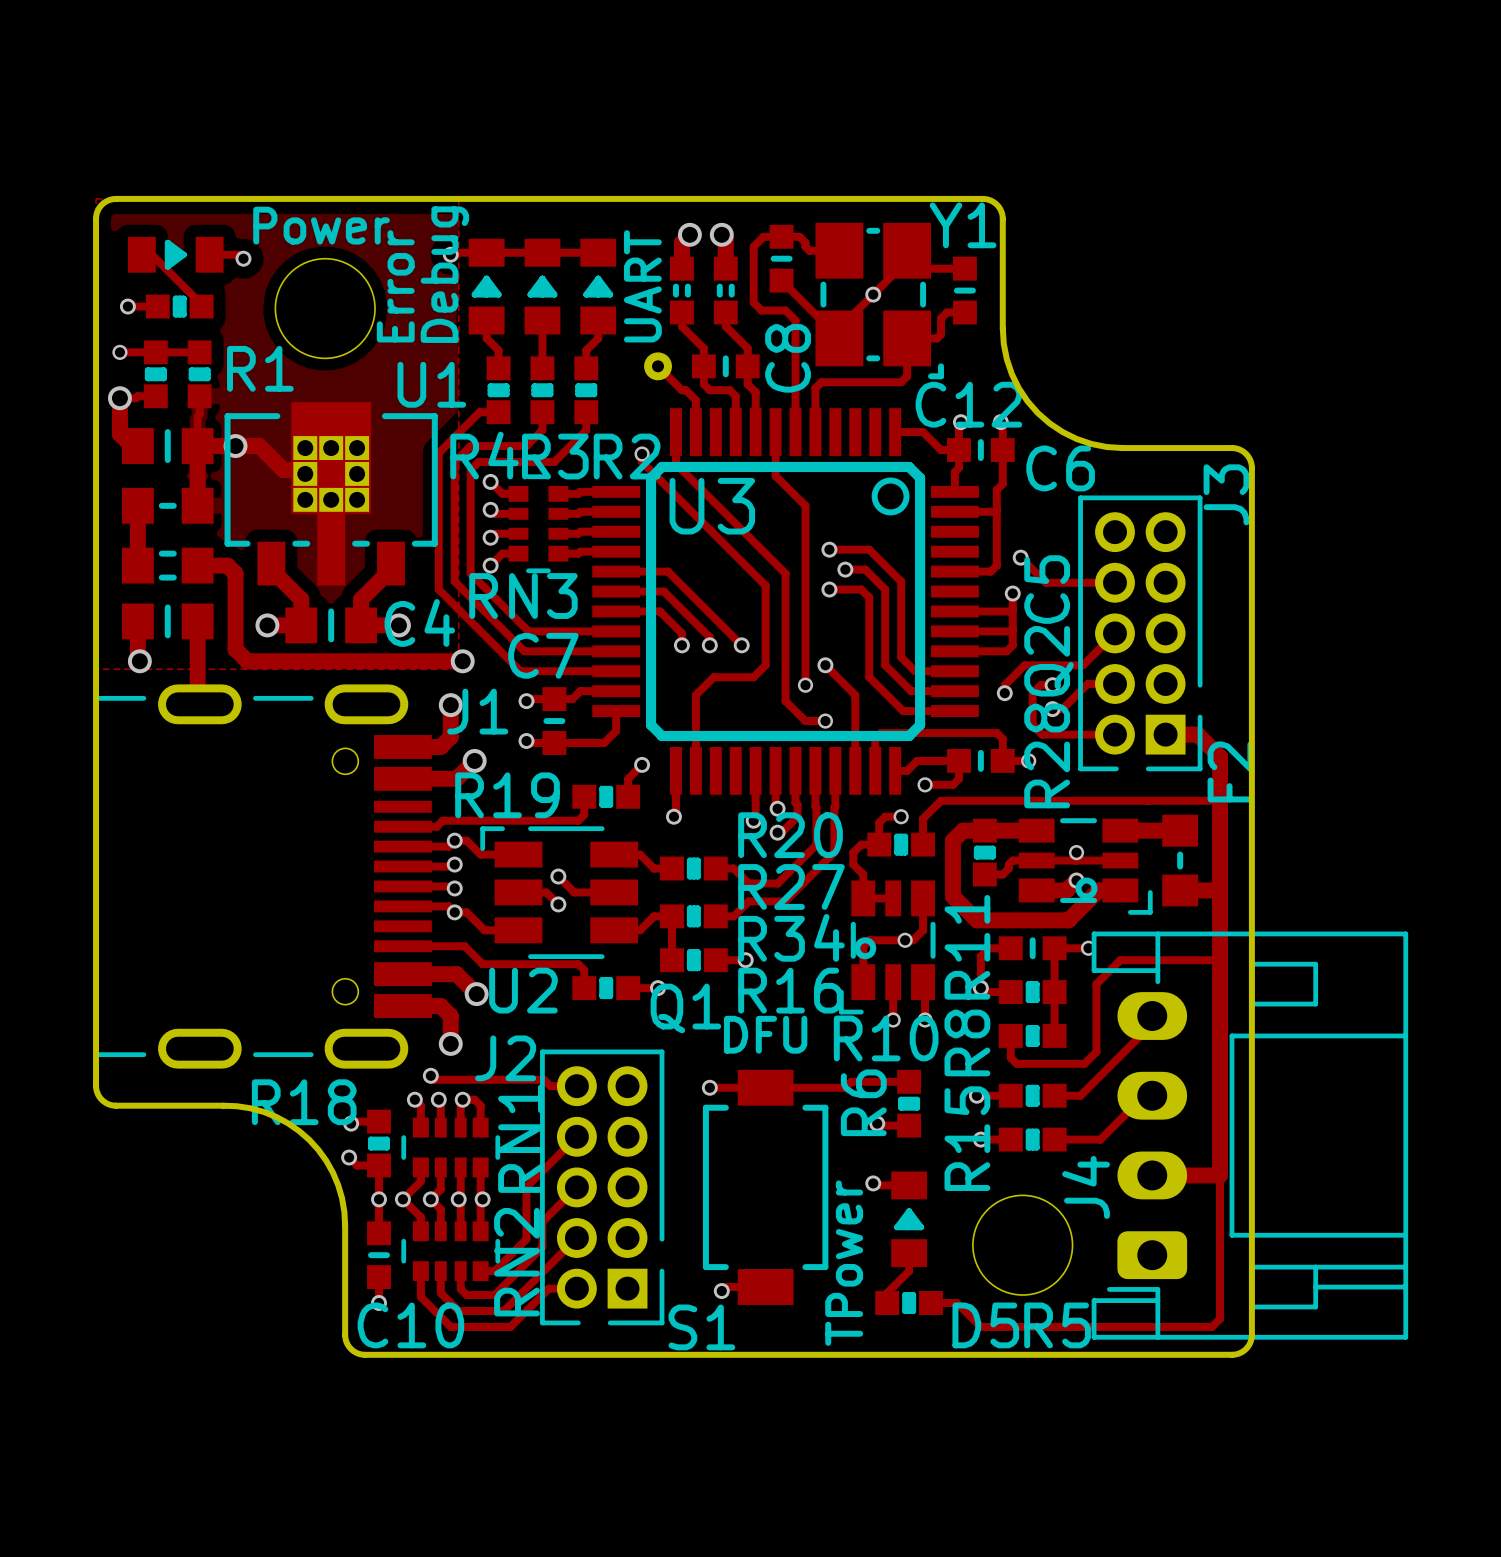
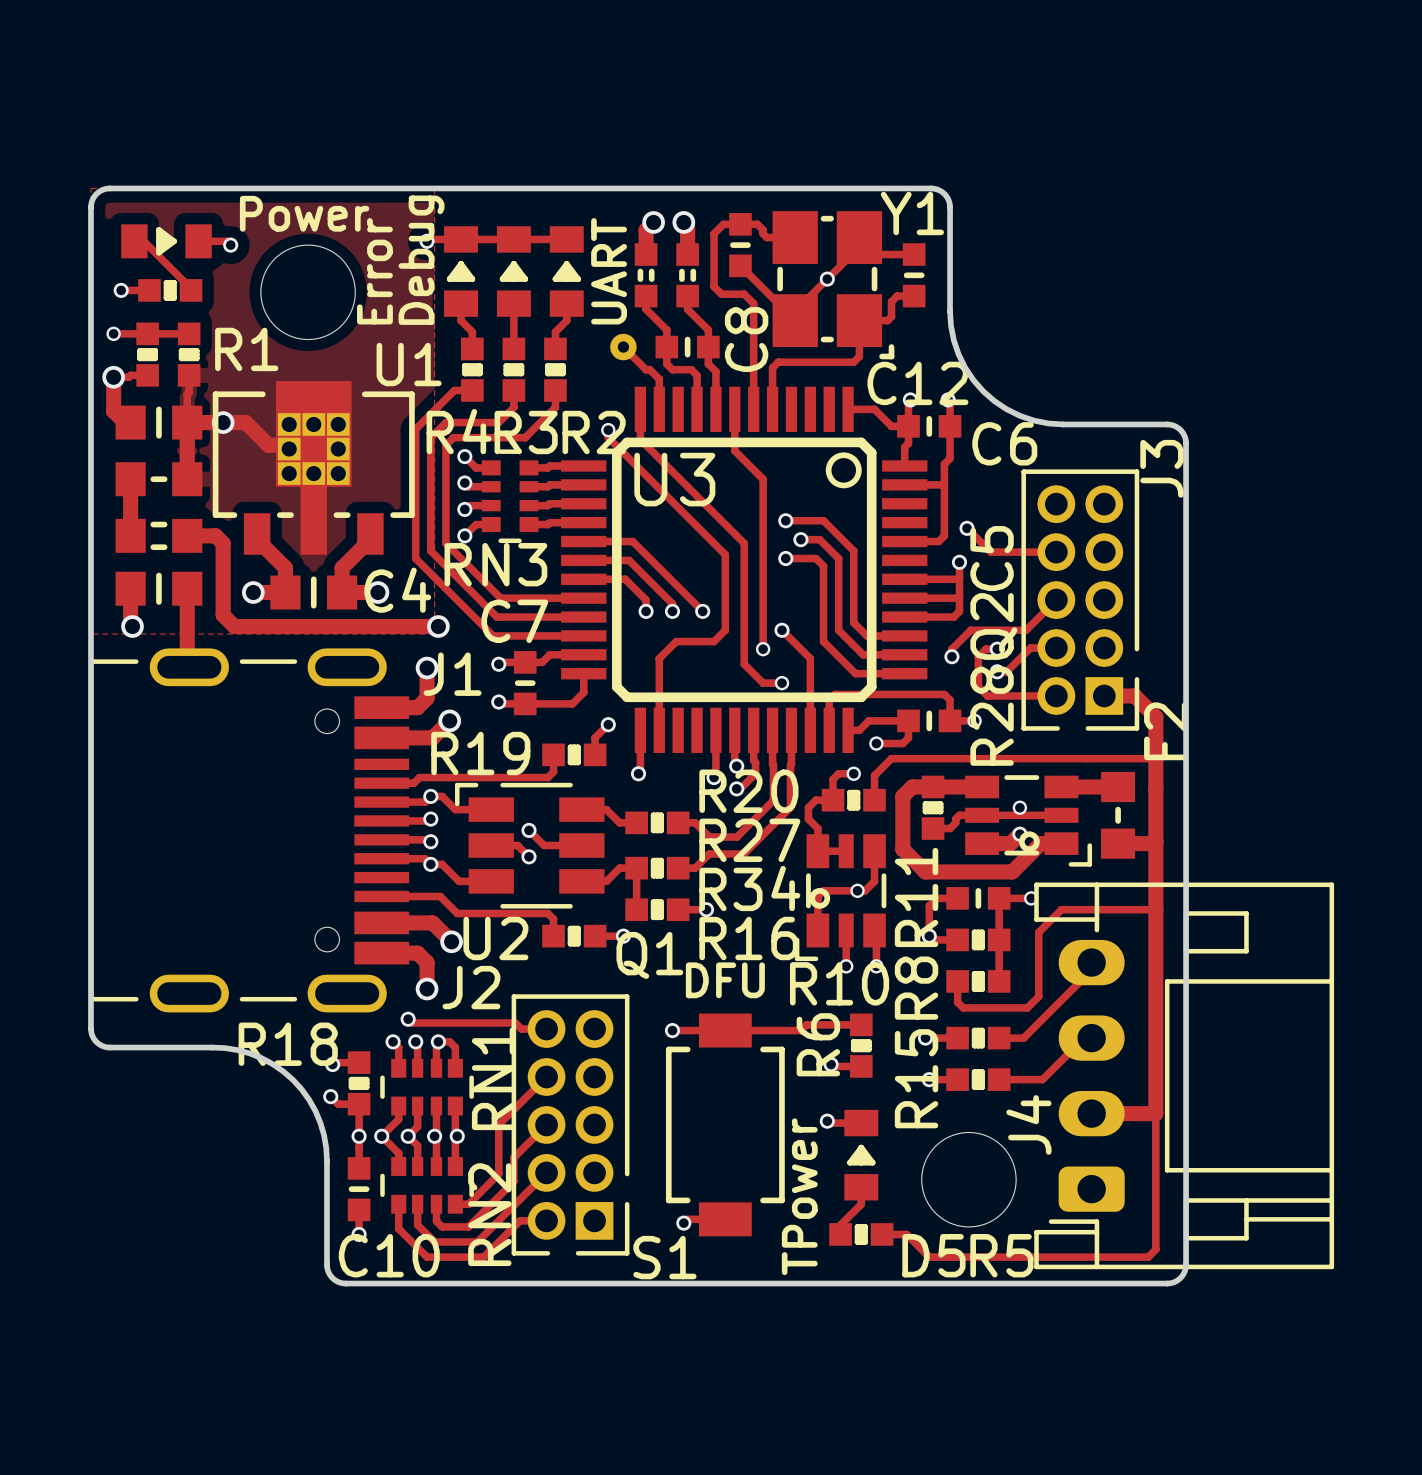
J2 name position: J2 (505, 1058) -> J2 (471, 987)
RN2 name position: RN2 (517, 1262) -> RN2 (489, 1214)

